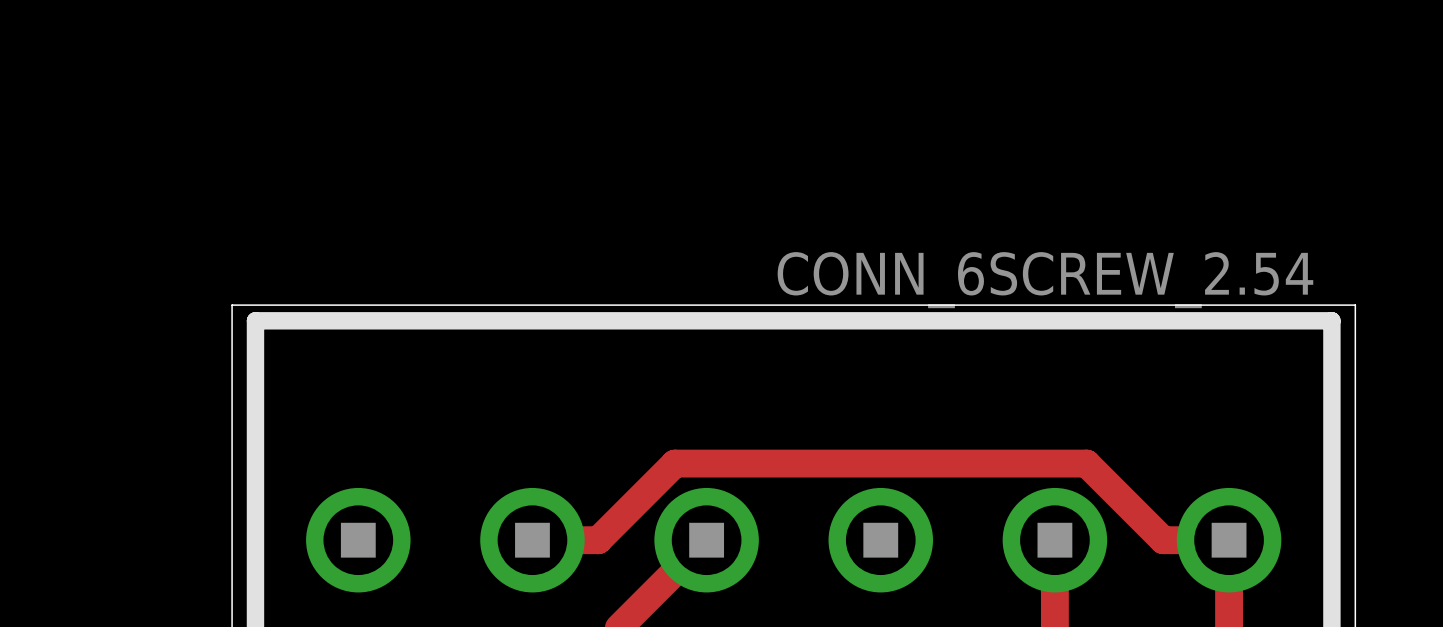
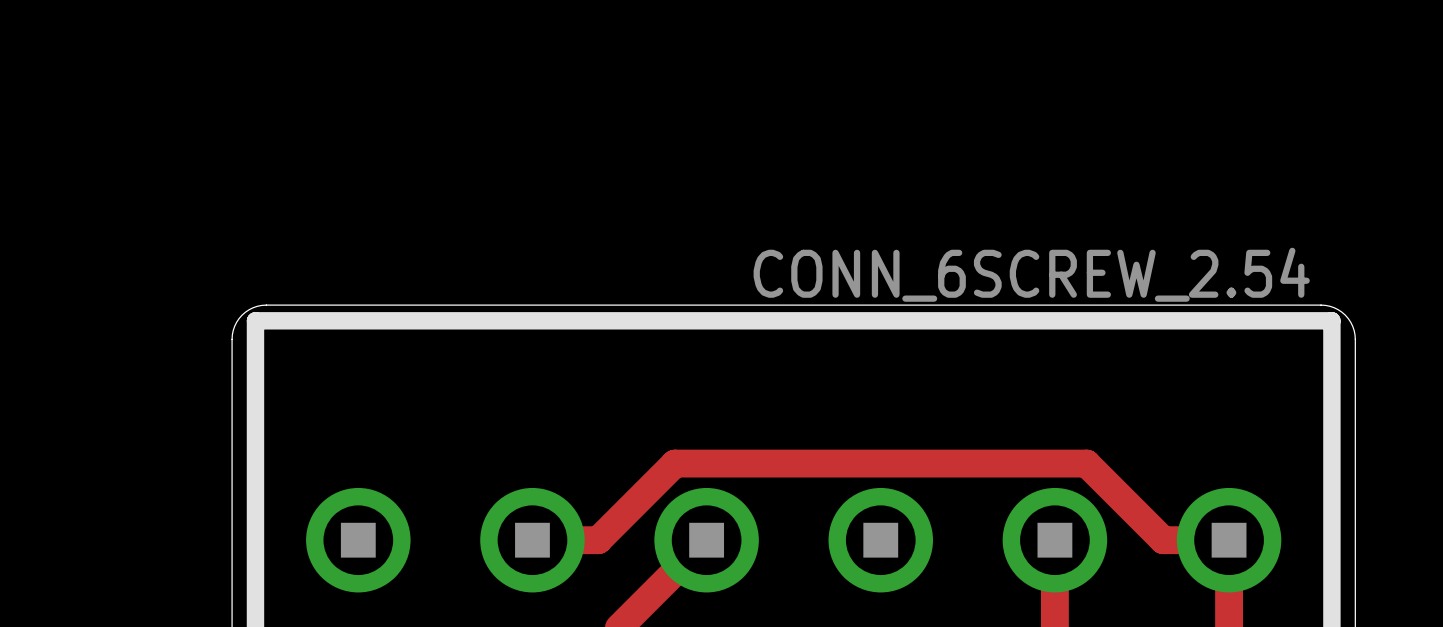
board edge: (266, 305) (232, 305) (232, 339) -> (266, 305) (253, 307) (242, 315) (234, 326) (232, 339)
board edge: (1321, 305) (1355, 305) (1355, 339) -> (1321, 305) (1334, 307) (1345, 315) (1352, 326) (1355, 339)

